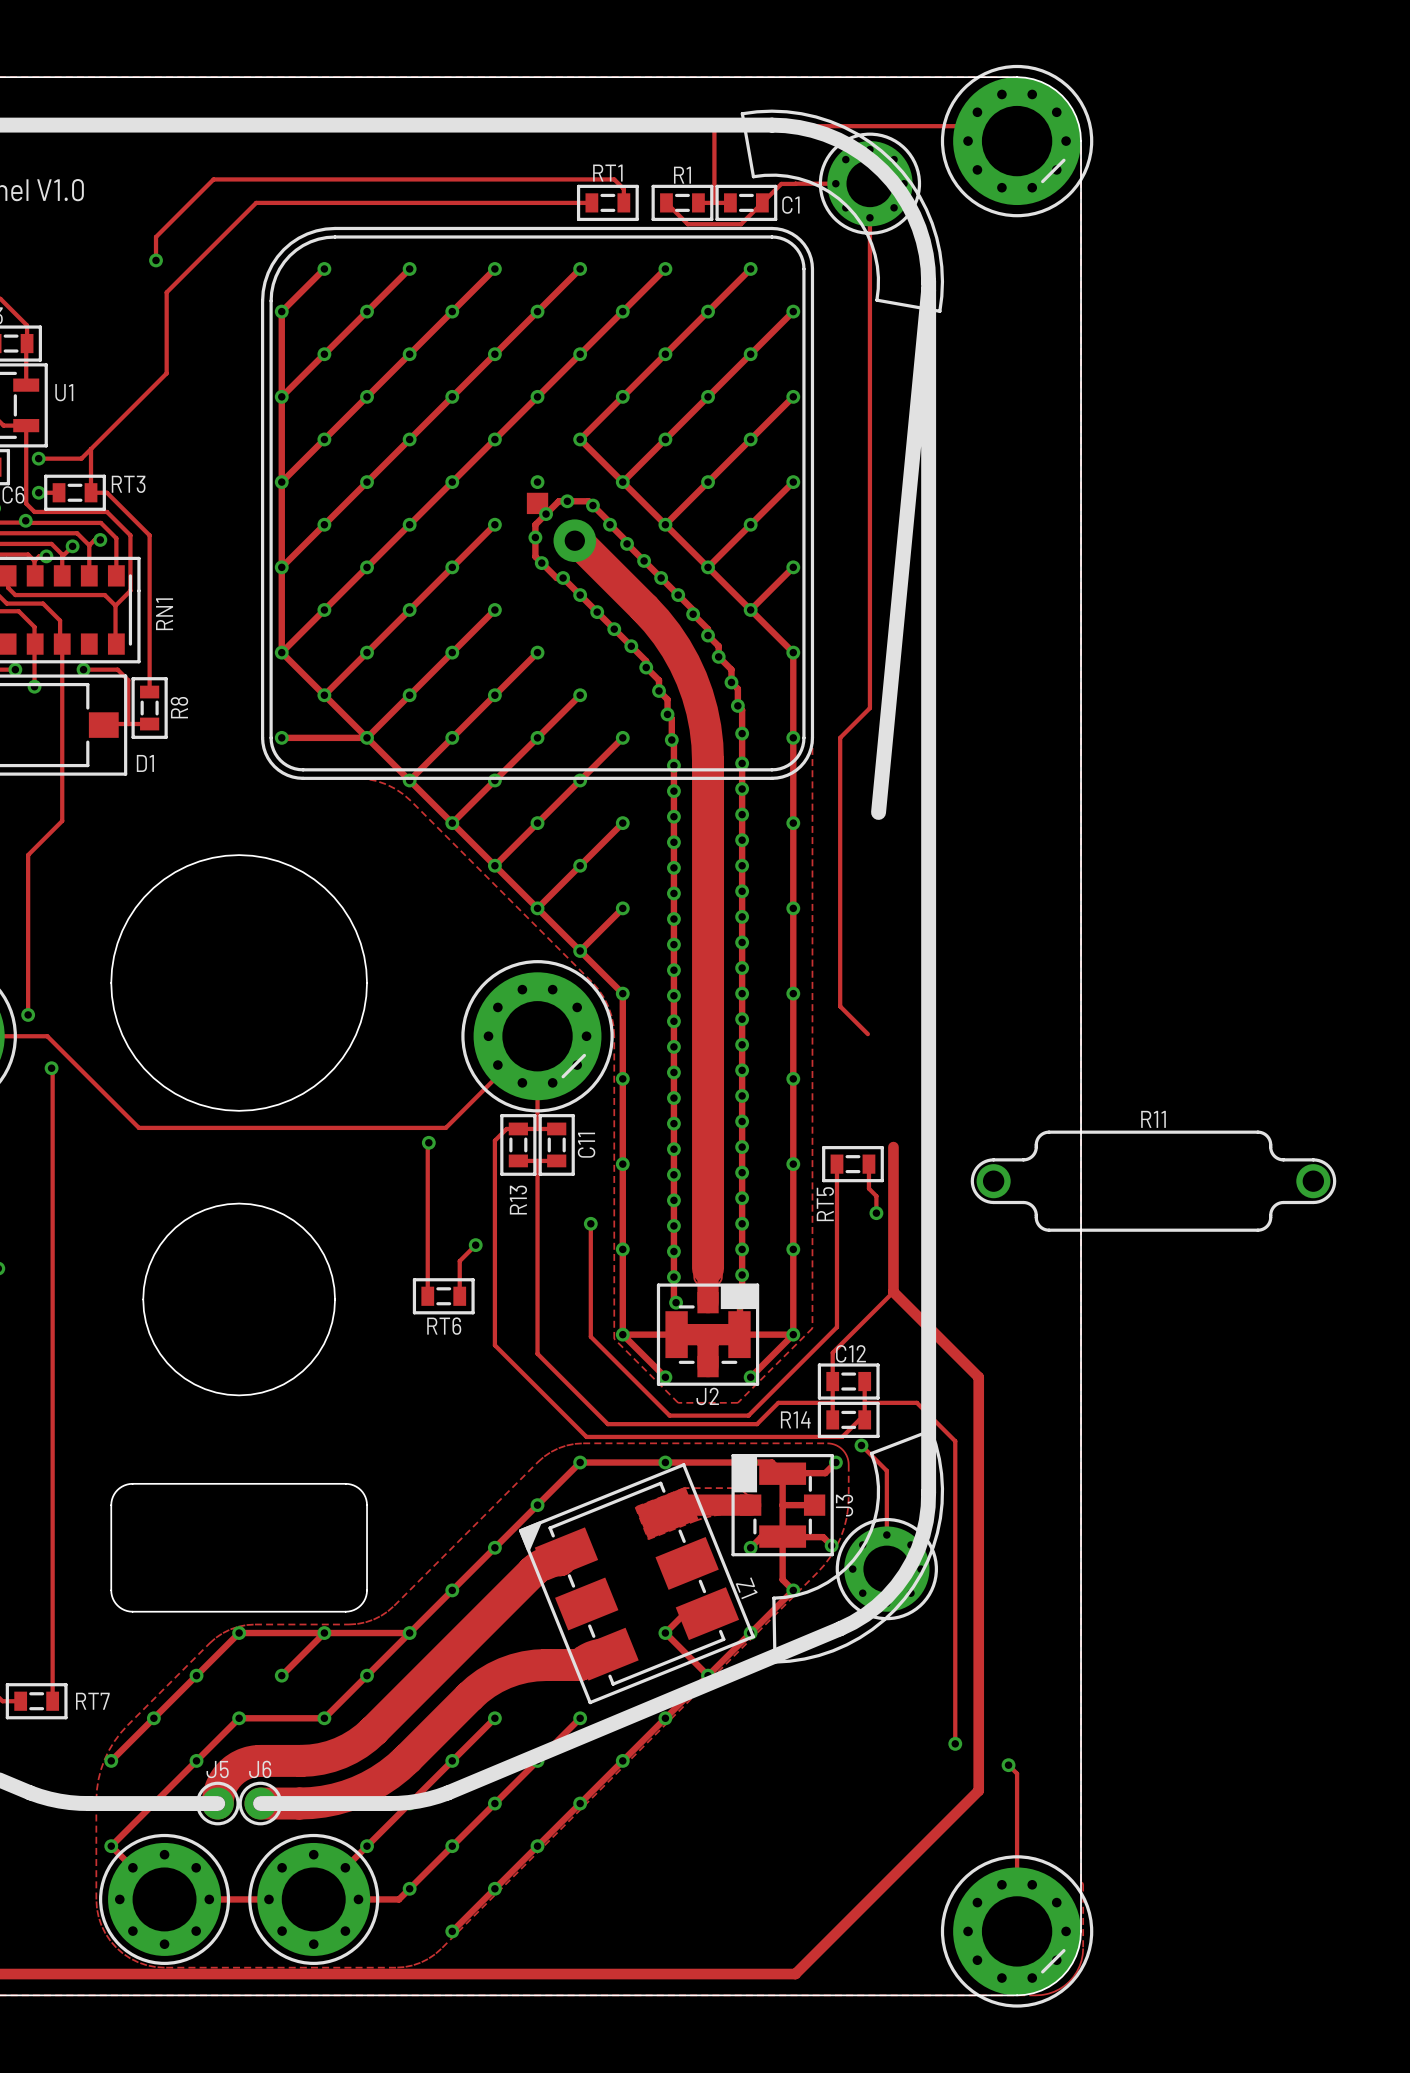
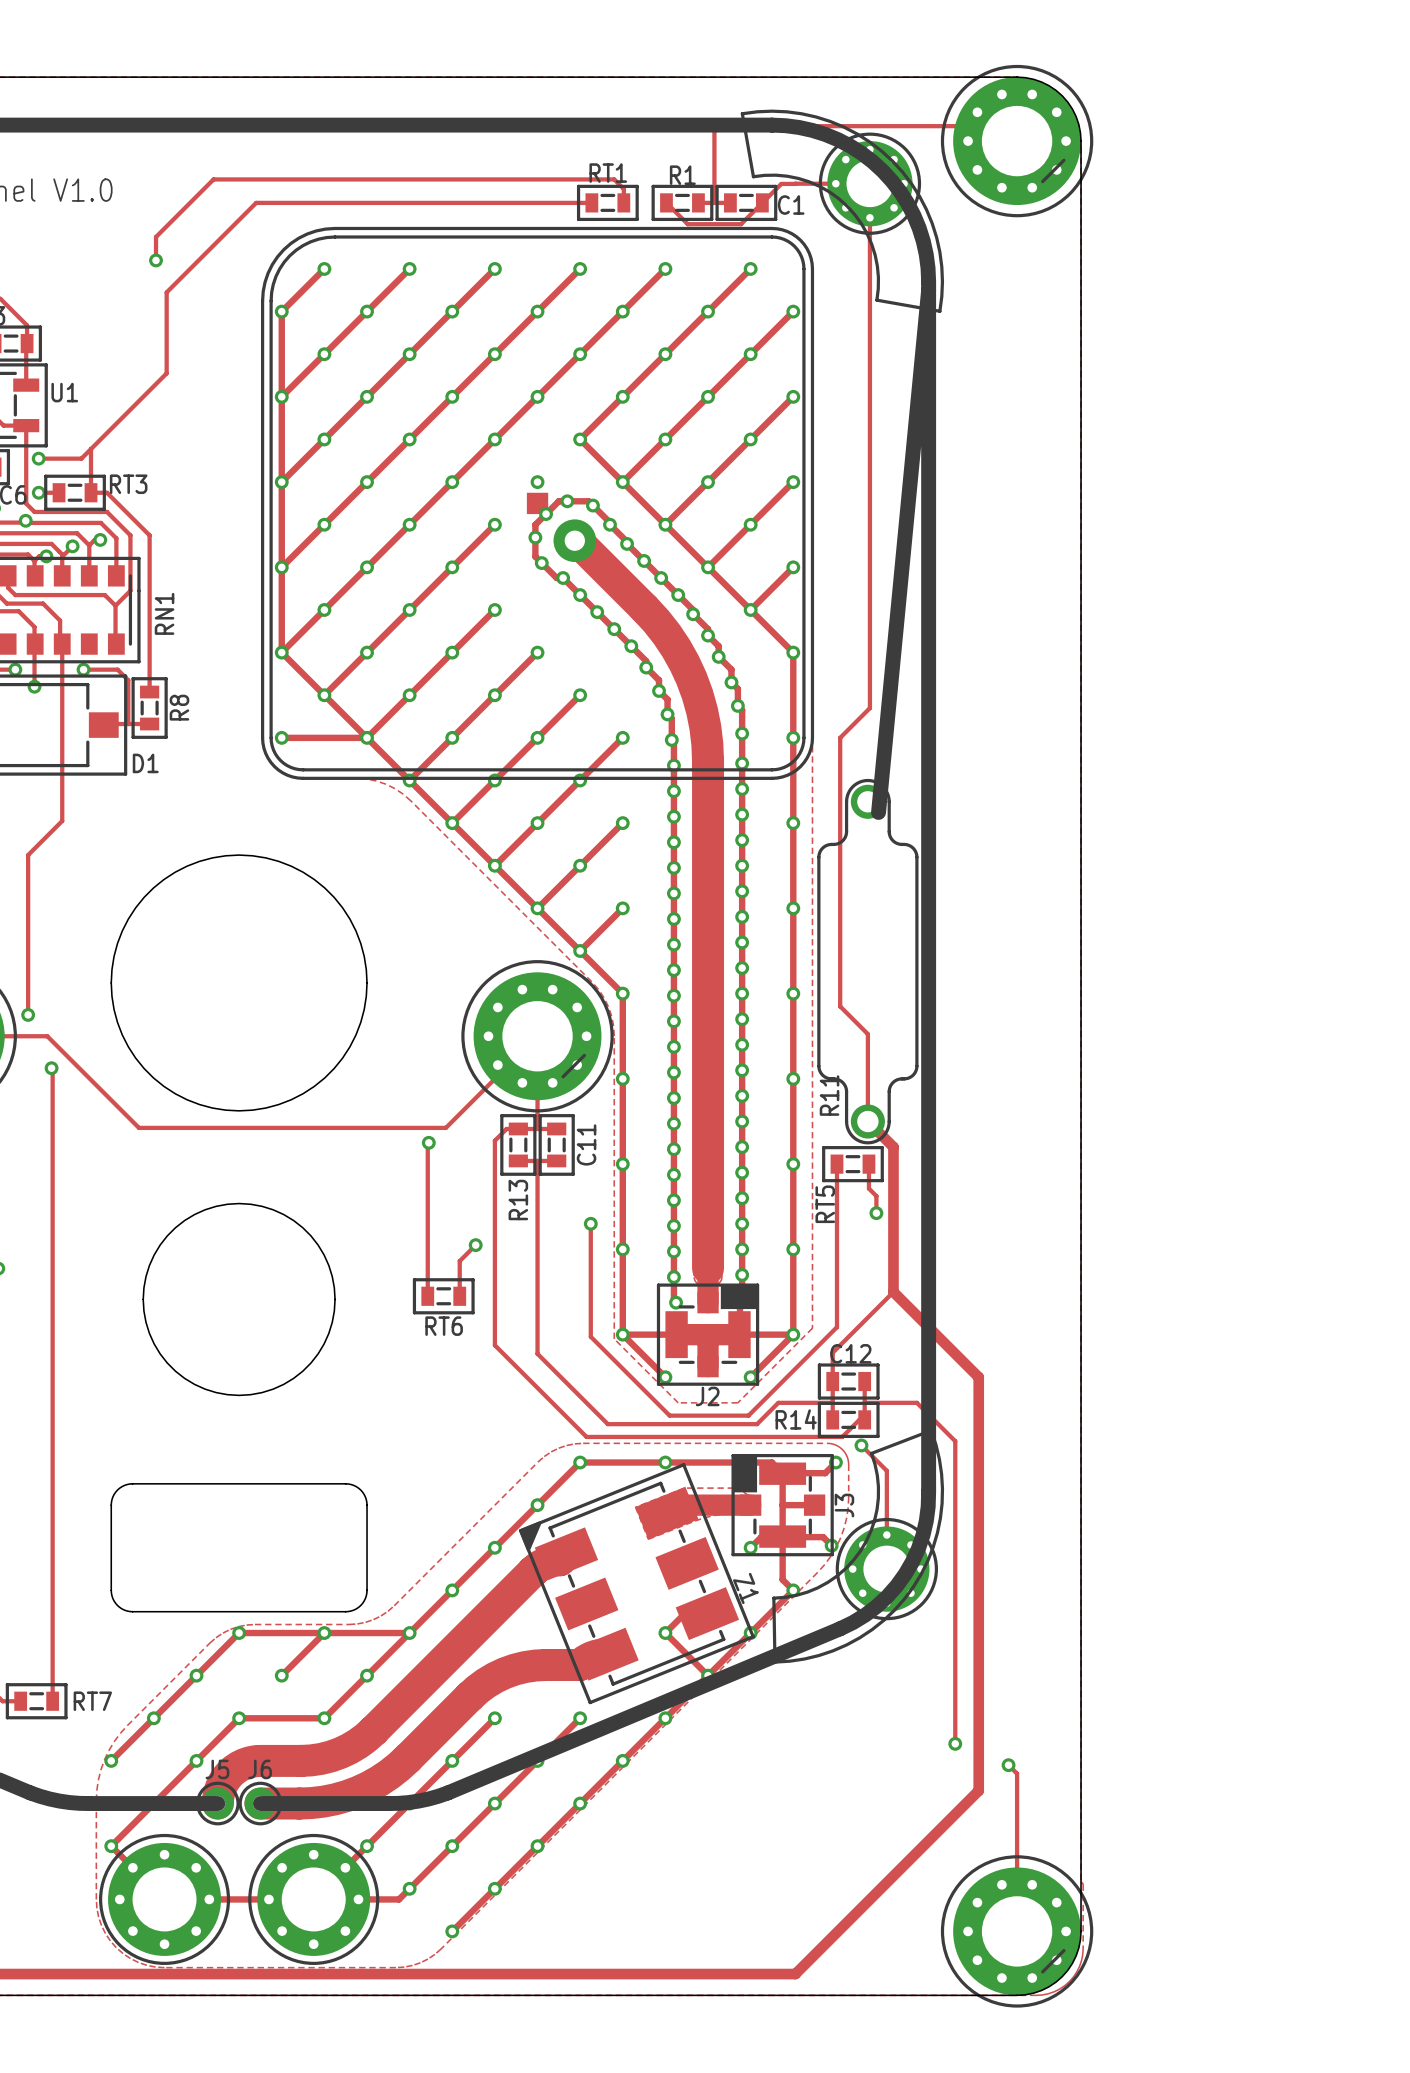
track: none -> (867, 1034) (867, 1121) (893, 1147)
R11 name position: R11 (1153, 1119) -> R11 (829, 1095)
R11 rotation: 0° (1153, 1181) -> 90° clockwise (867, 961)
R11 position: (1153, 1181) -> (867, 961)

